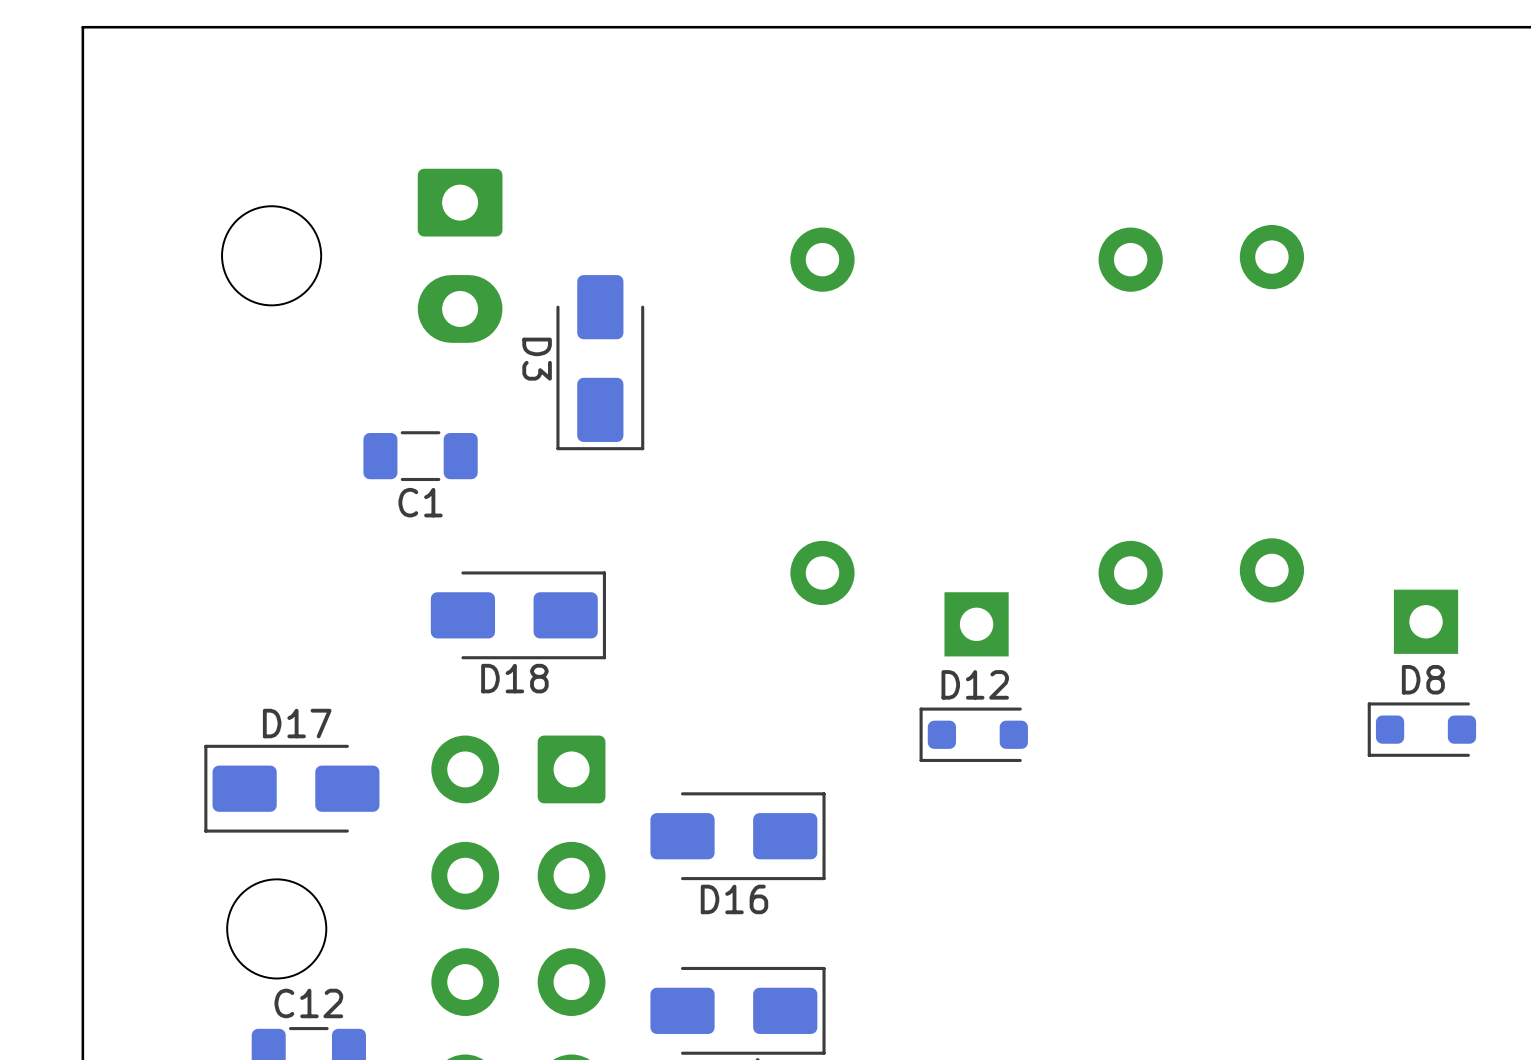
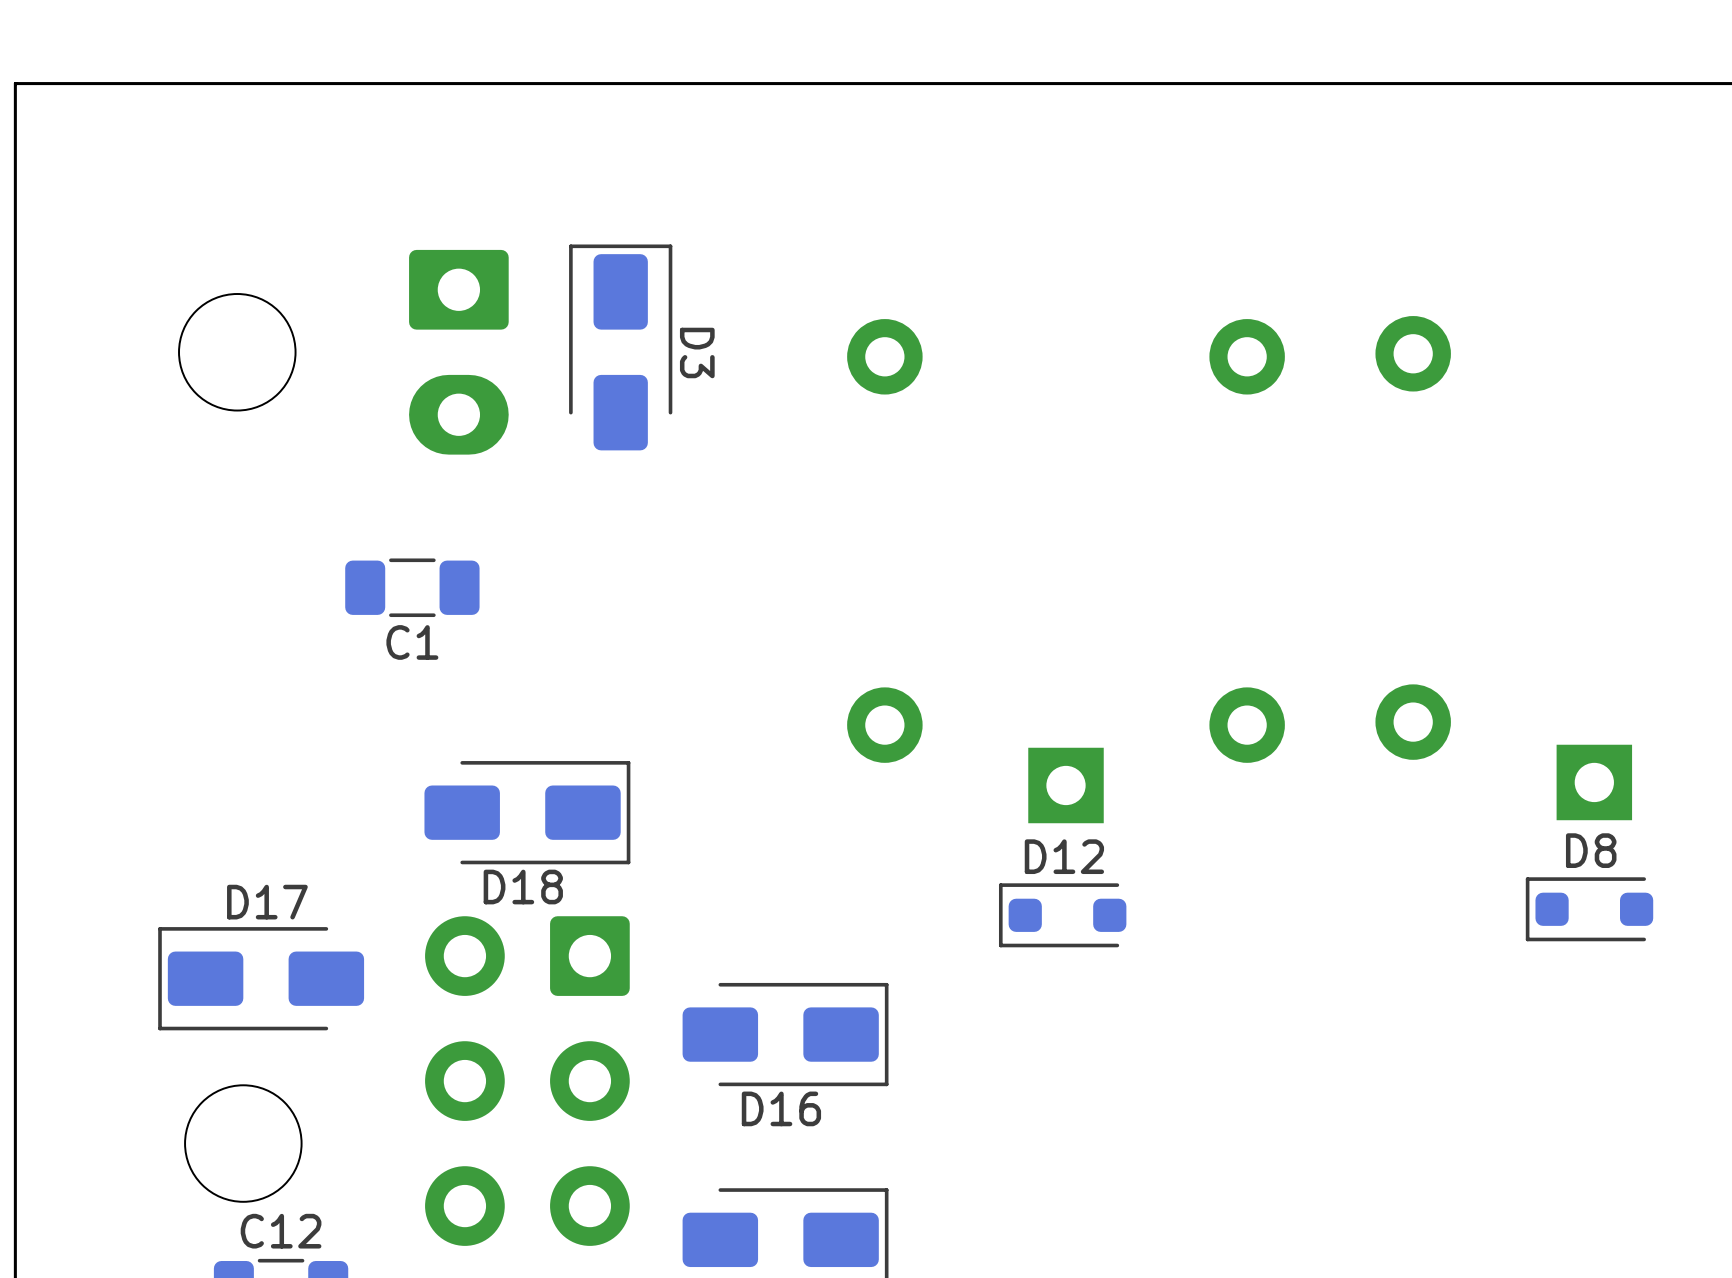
D3 rotation: 0° (600, 362) -> 180° (620, 347)
D3 position: (600, 362) -> (620, 347)
D18 position: (518, 615) -> (527, 812)

